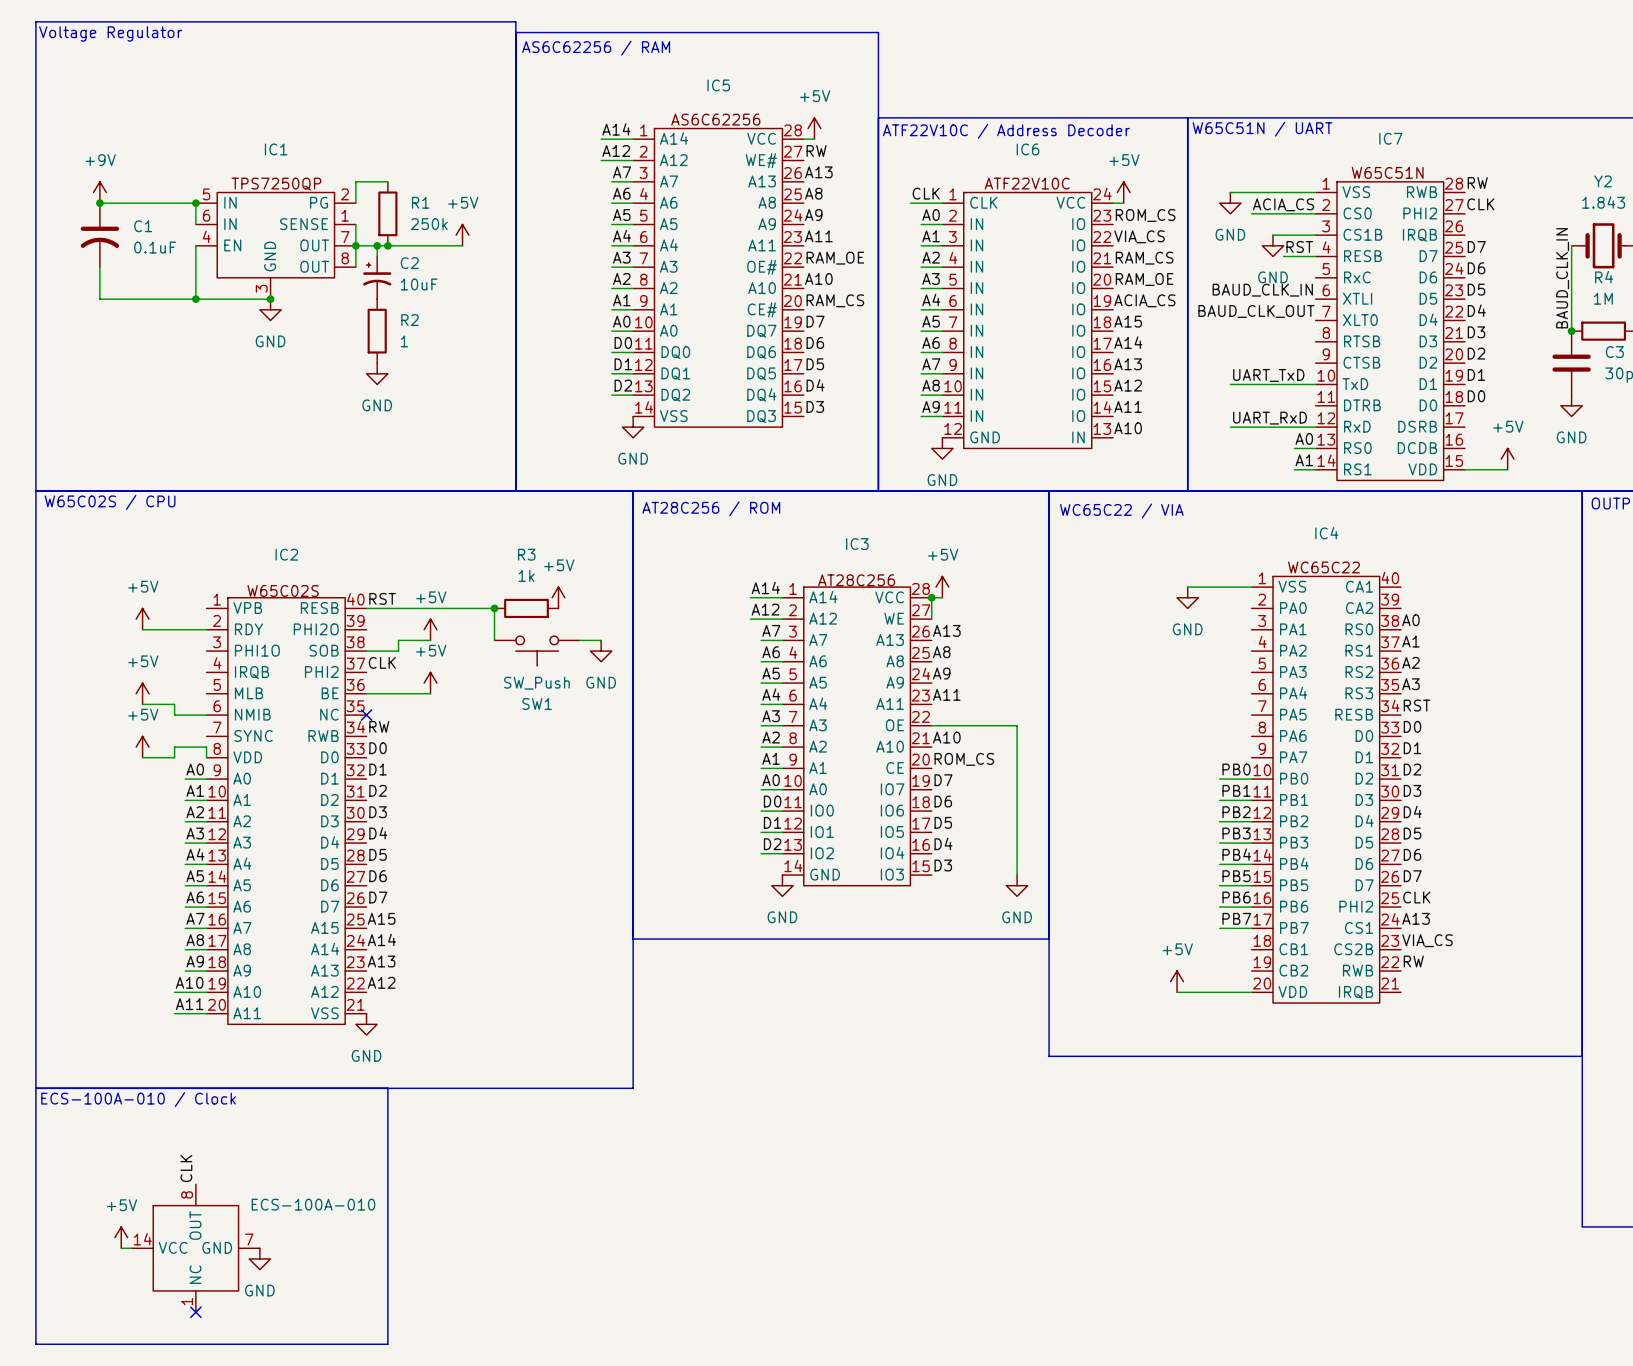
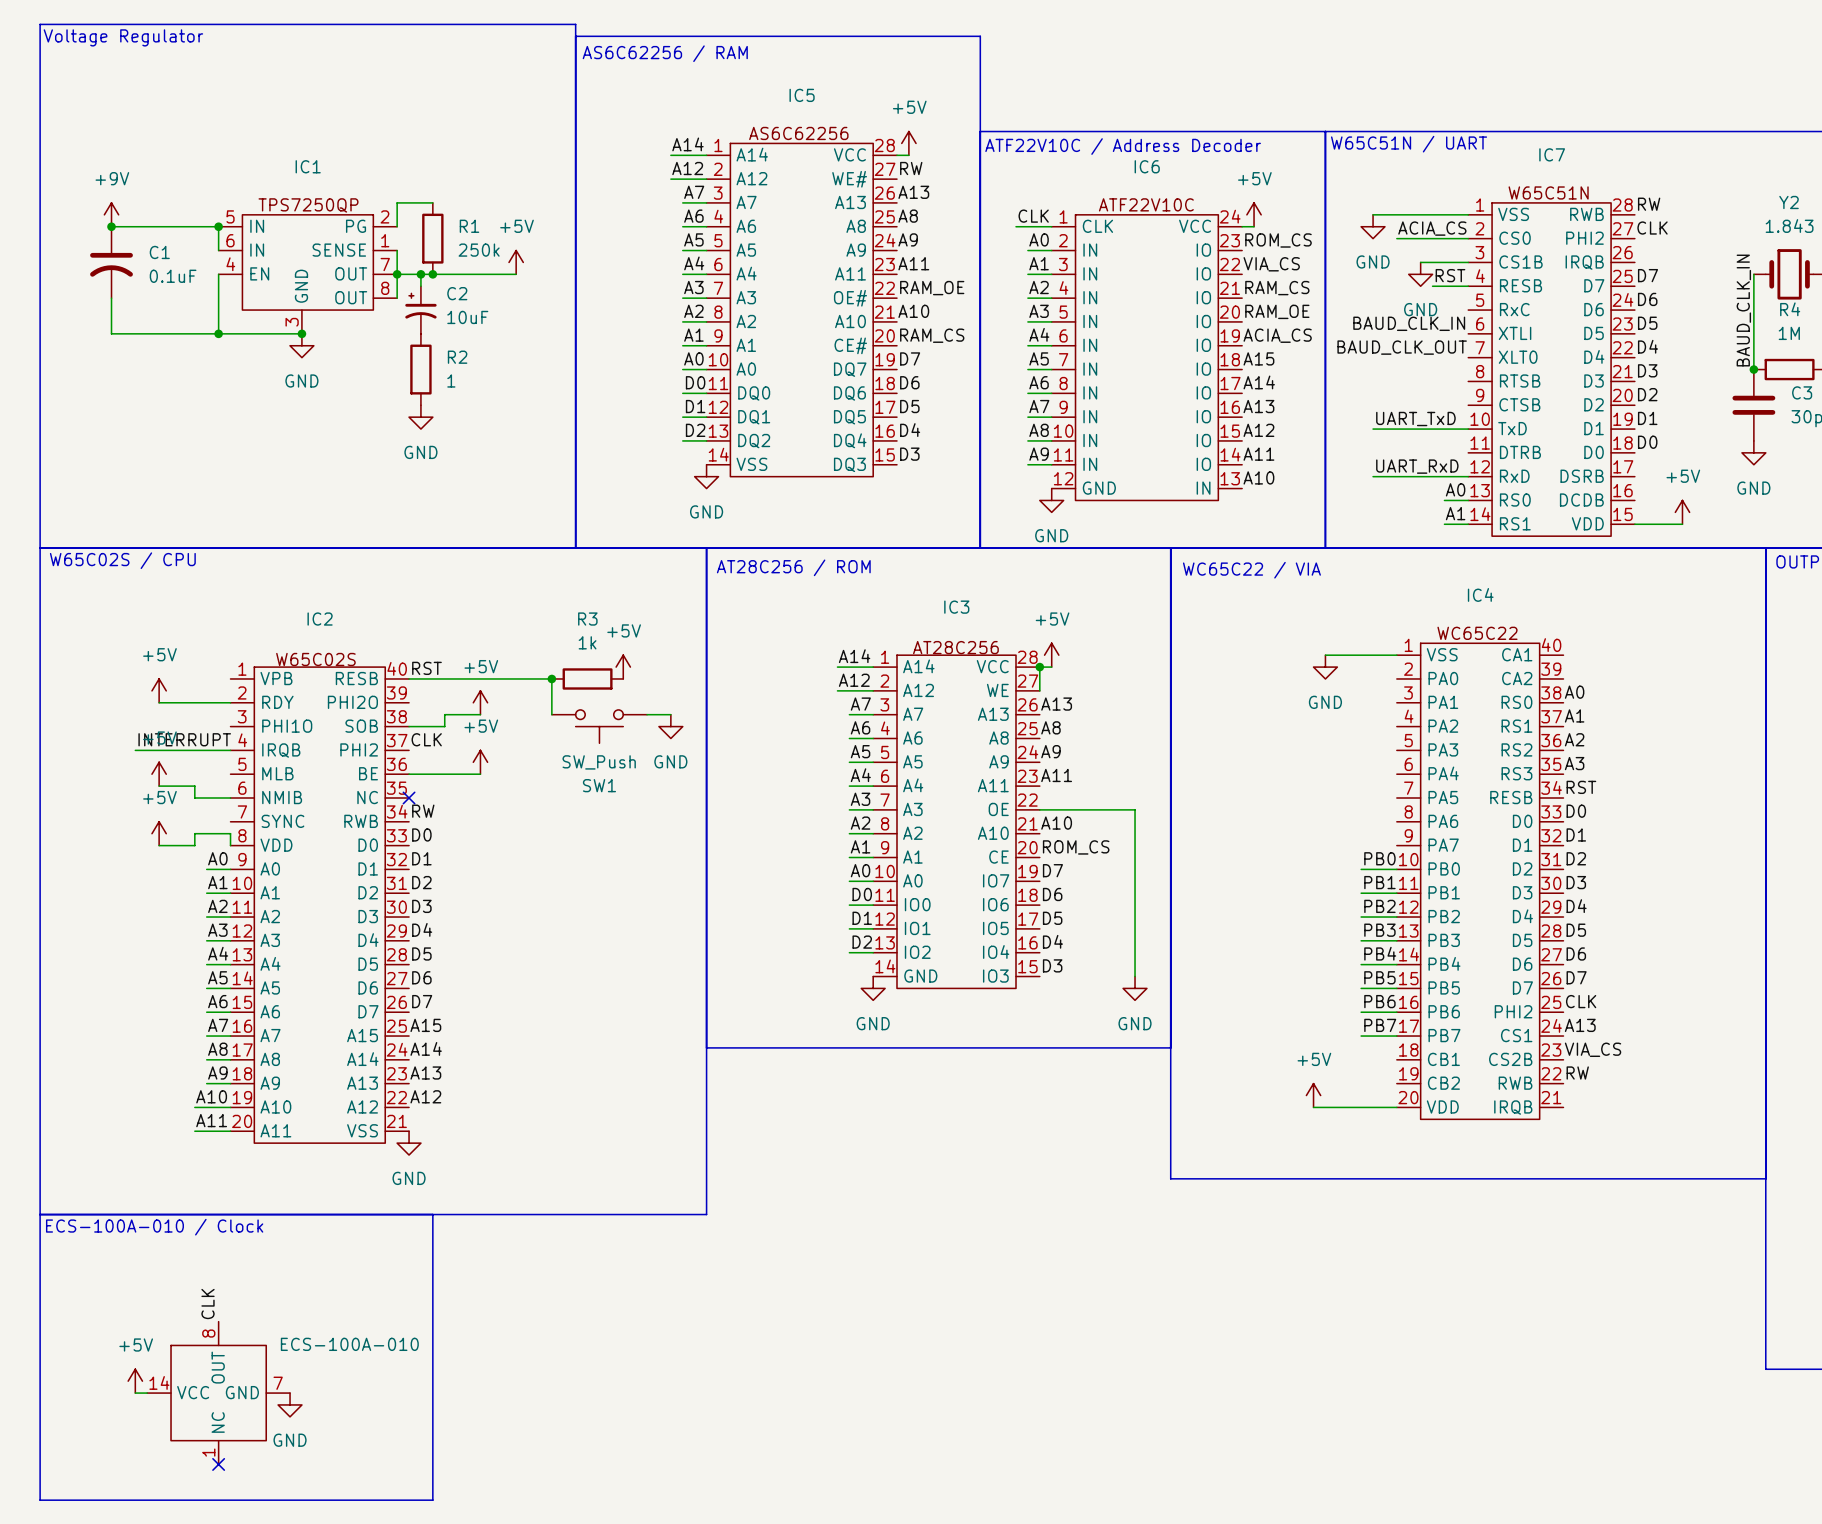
label: none -> INTERRUPT (184, 739)
wire: none -> (135, 750) (230, 750)

